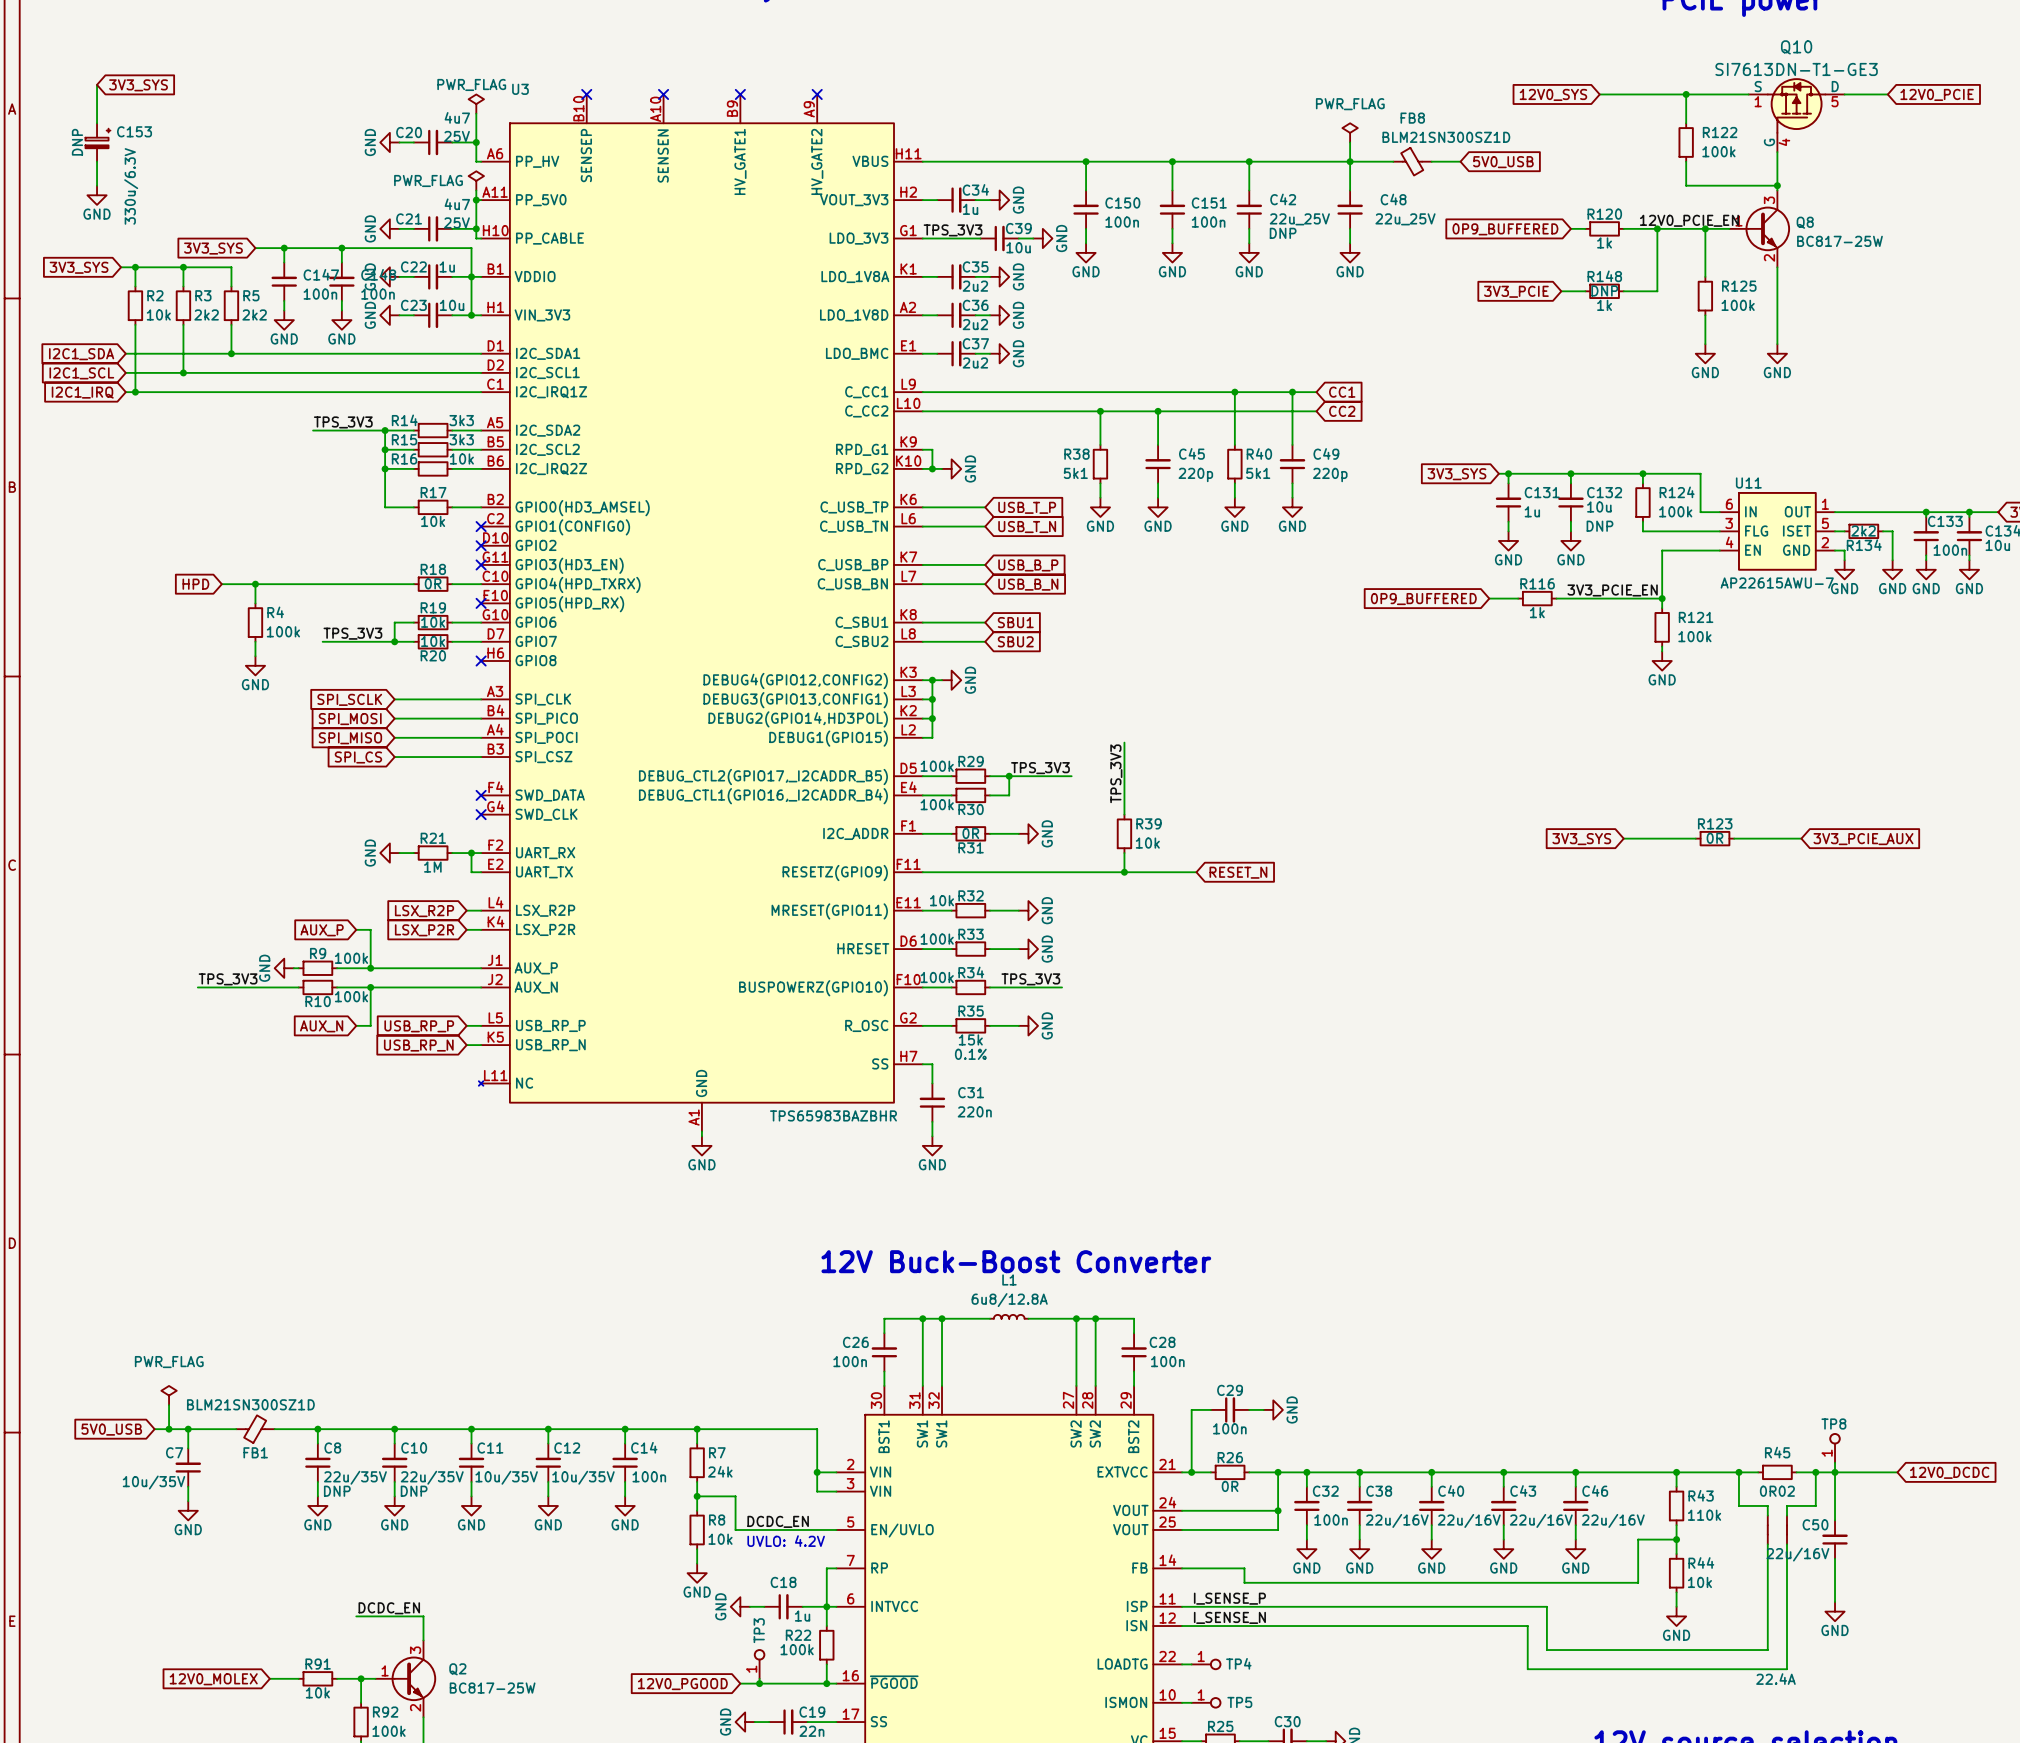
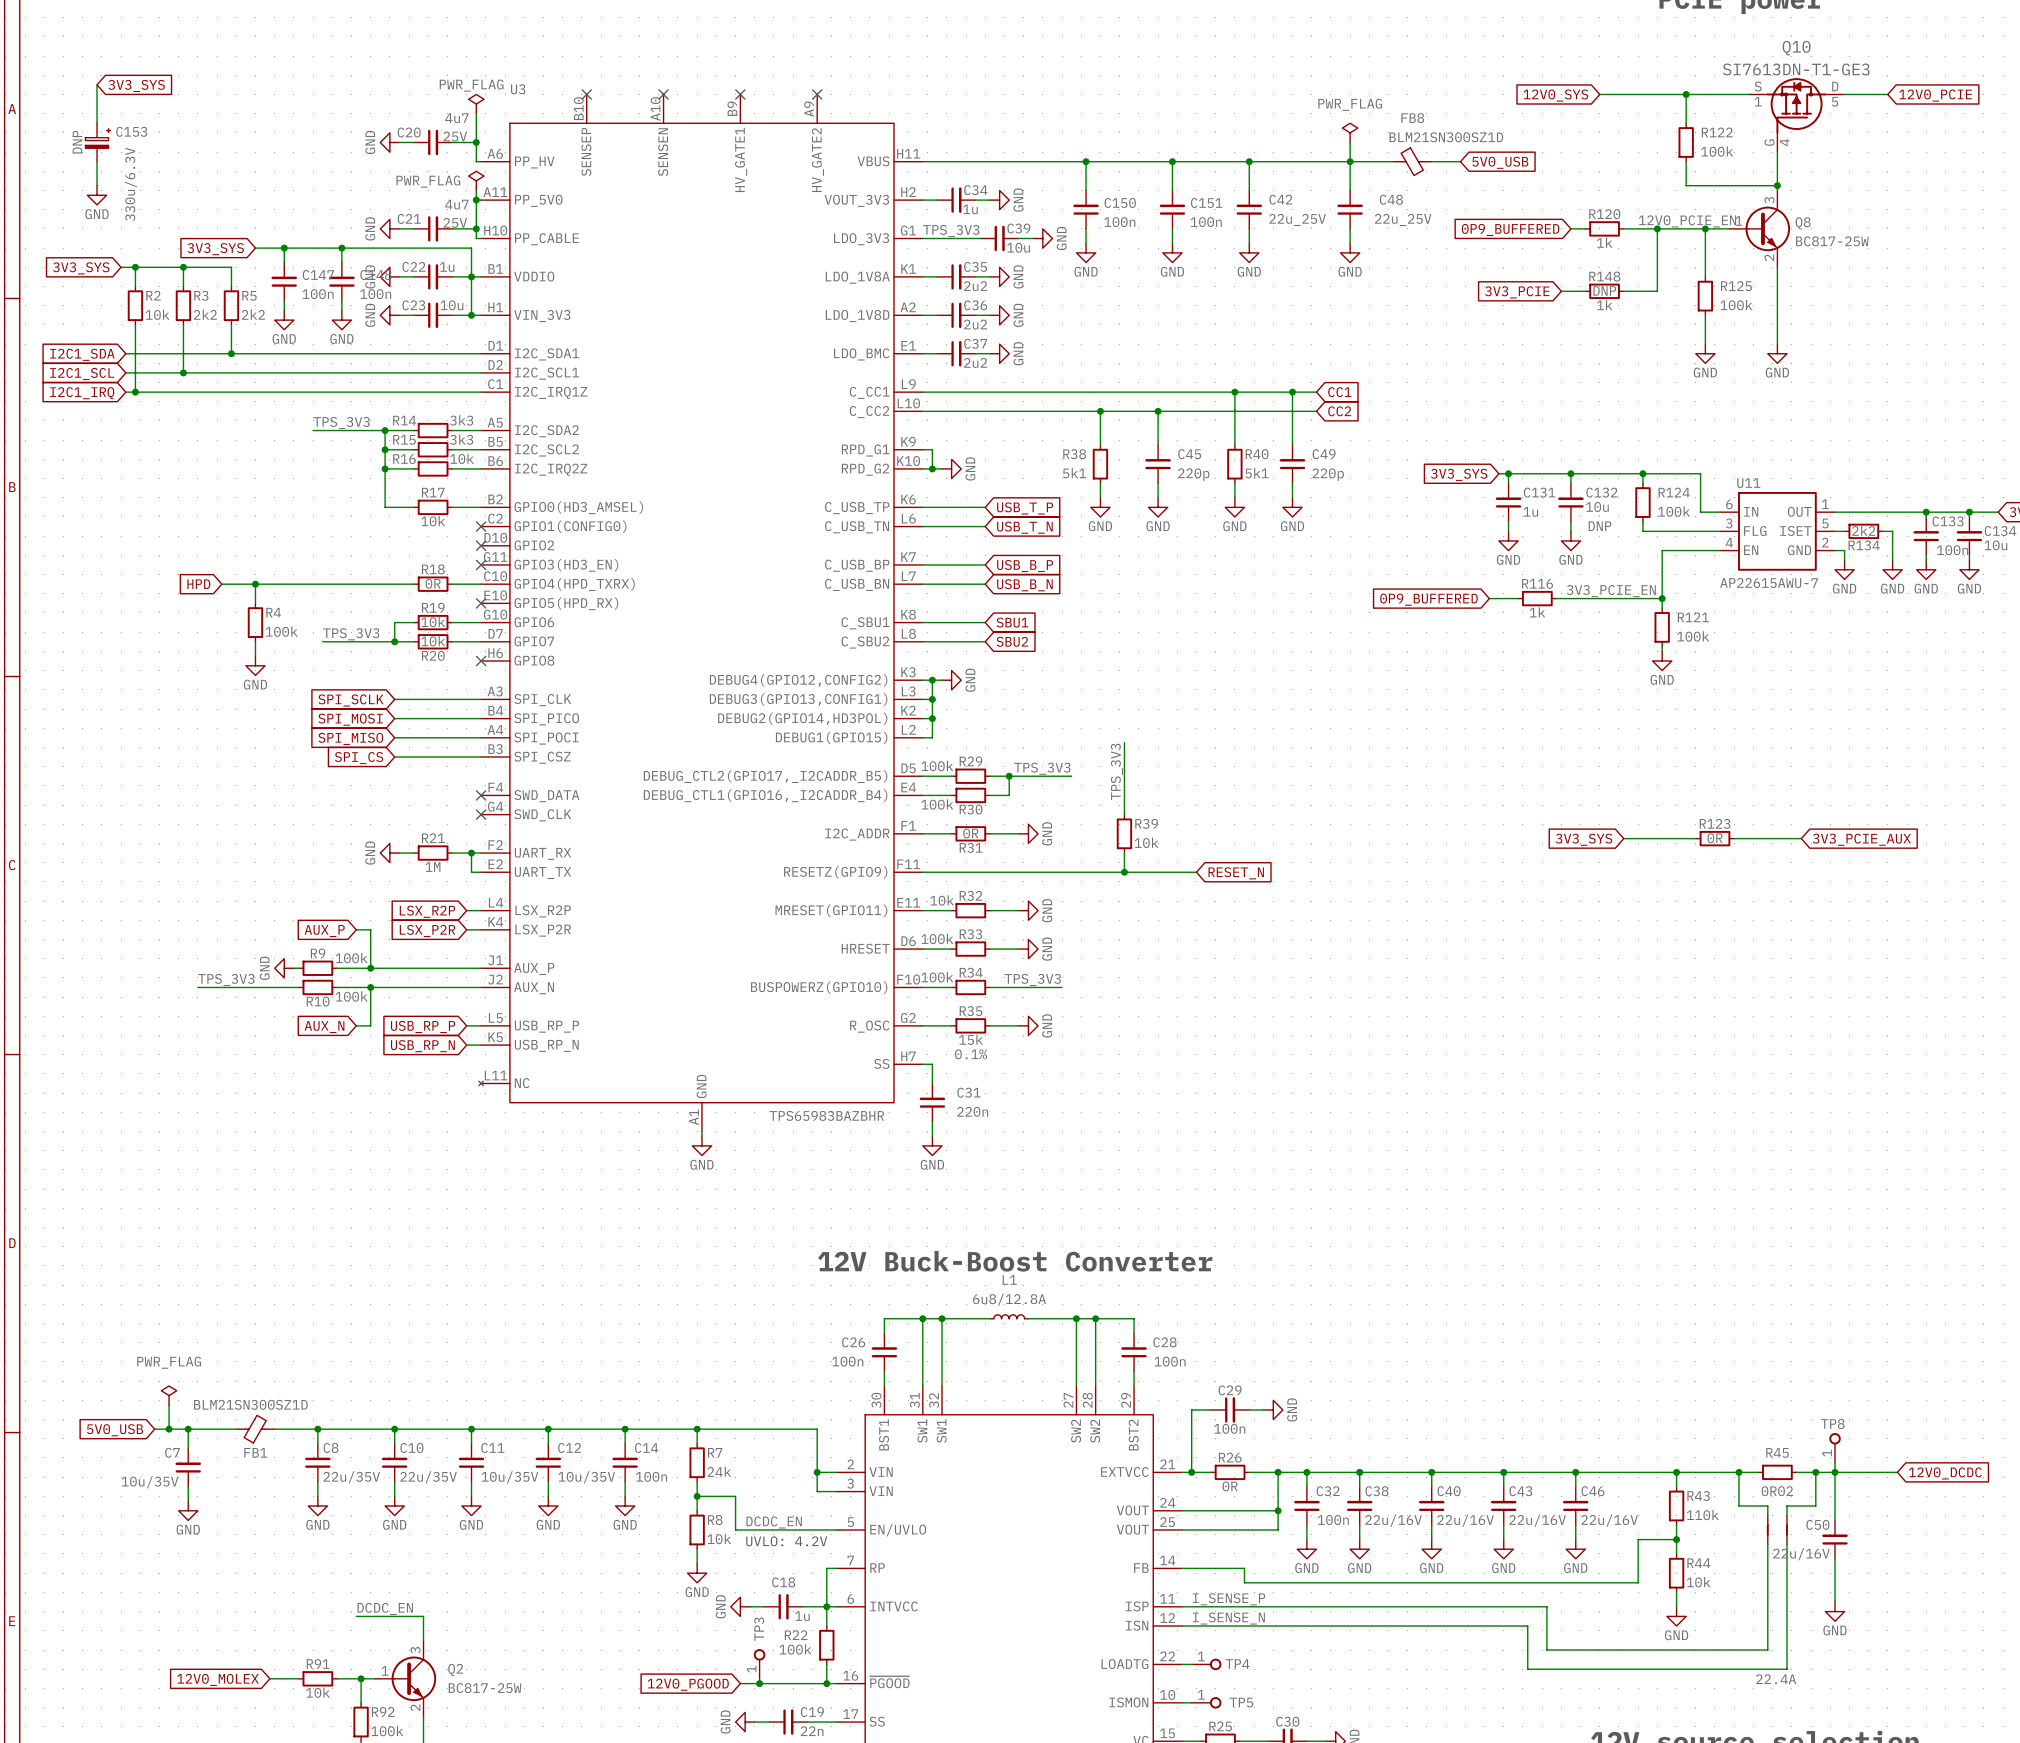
C42 text: DNP (1283, 233) -> none
C8 text: DNP (337, 1491) -> none
C10 text: DNP (414, 1491) -> none

